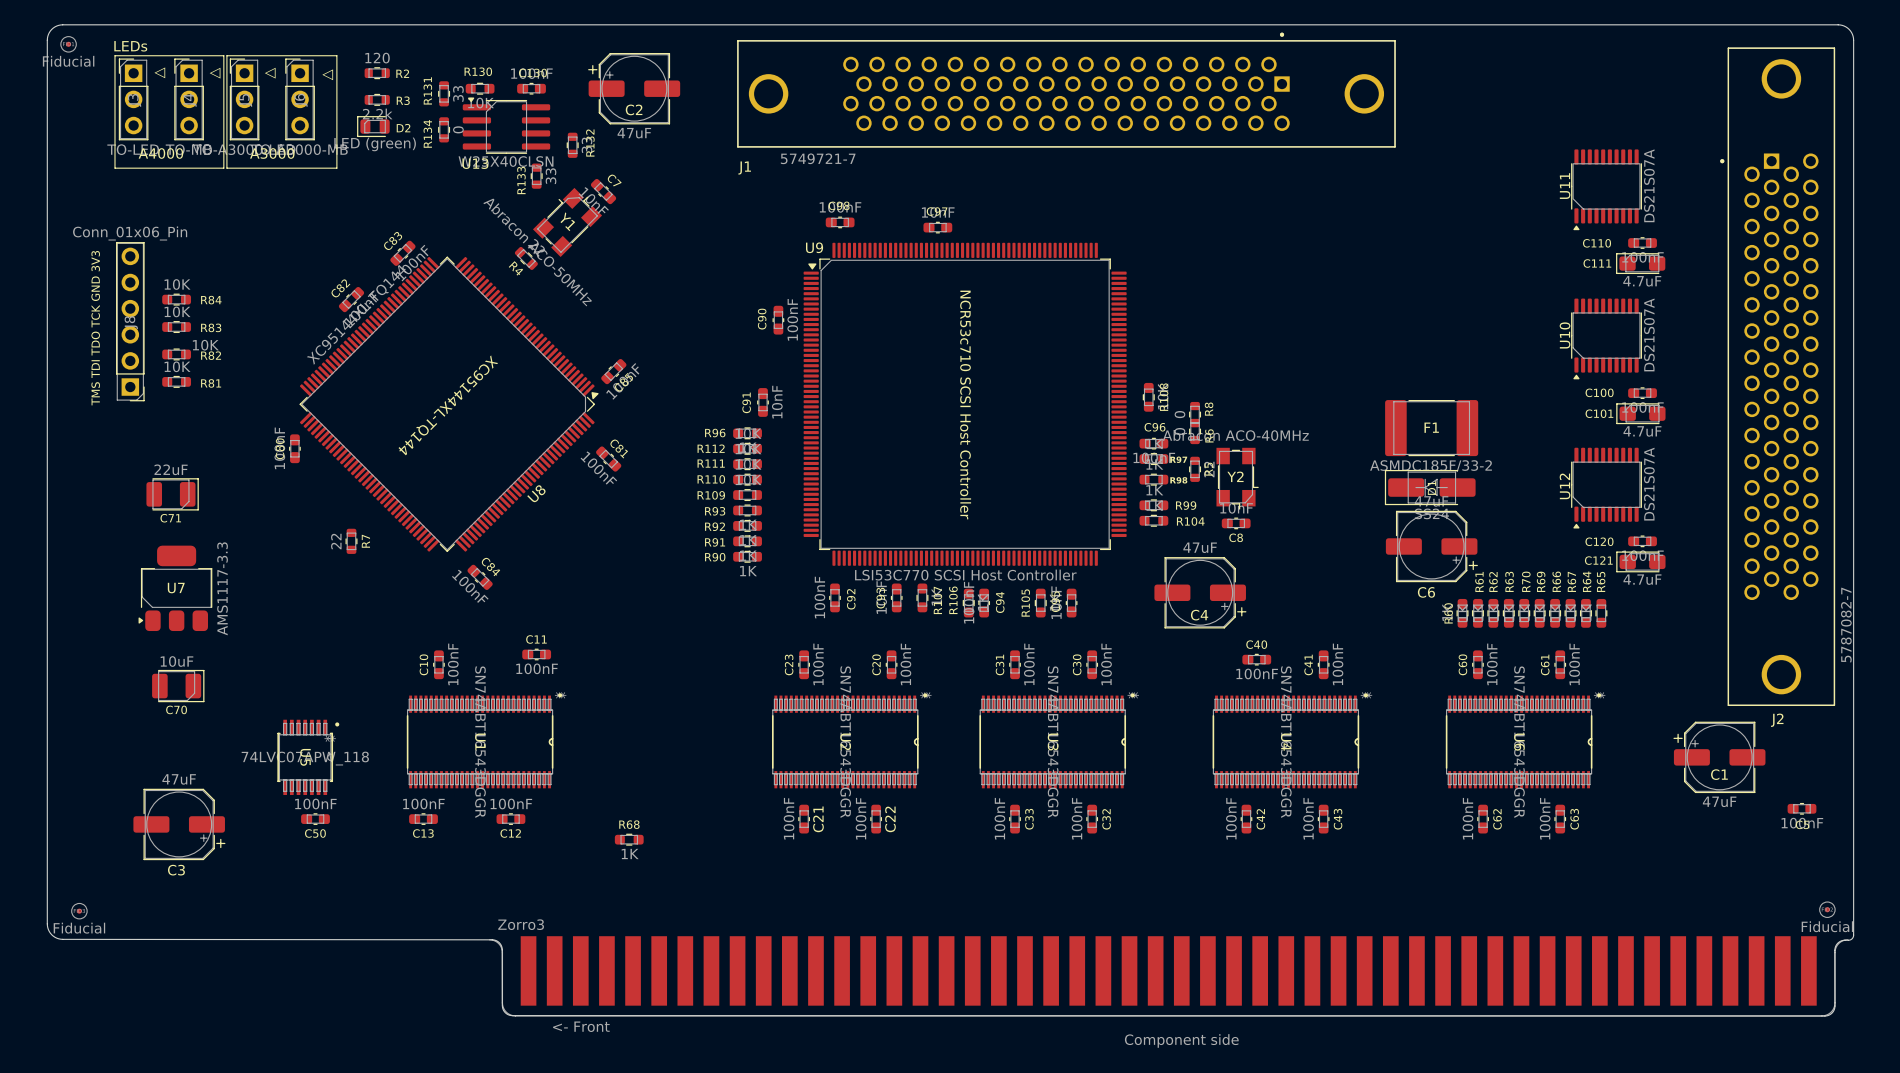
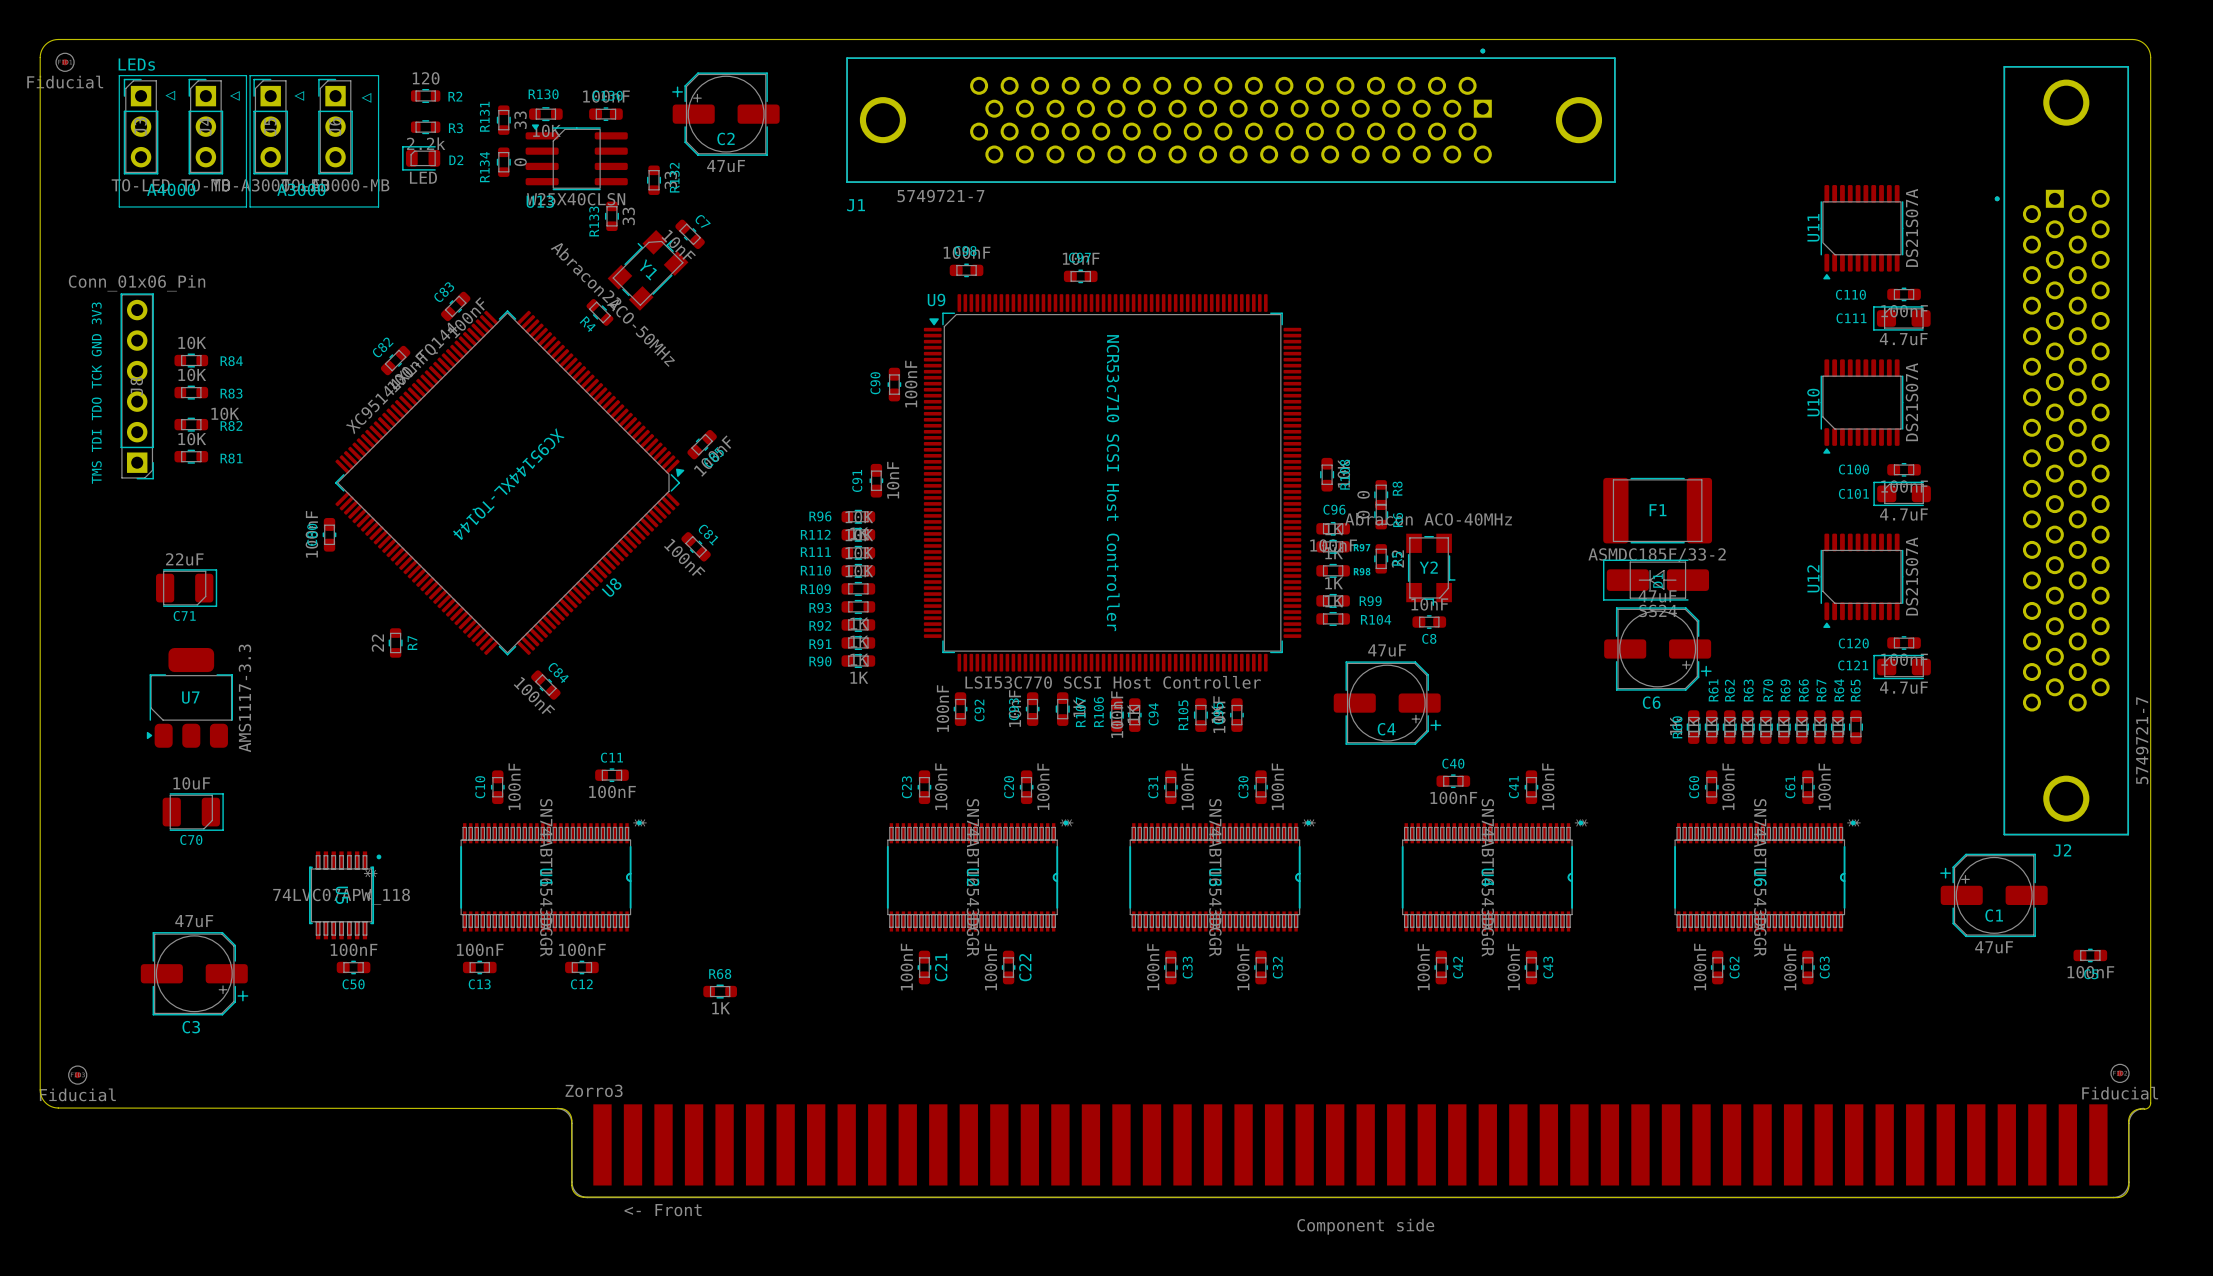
D2 value: LED (green) (375, 144) -> LED (423, 177)
J2 value: 5787082-7 (1846, 625) -> 5749721-7 (2142, 740)

